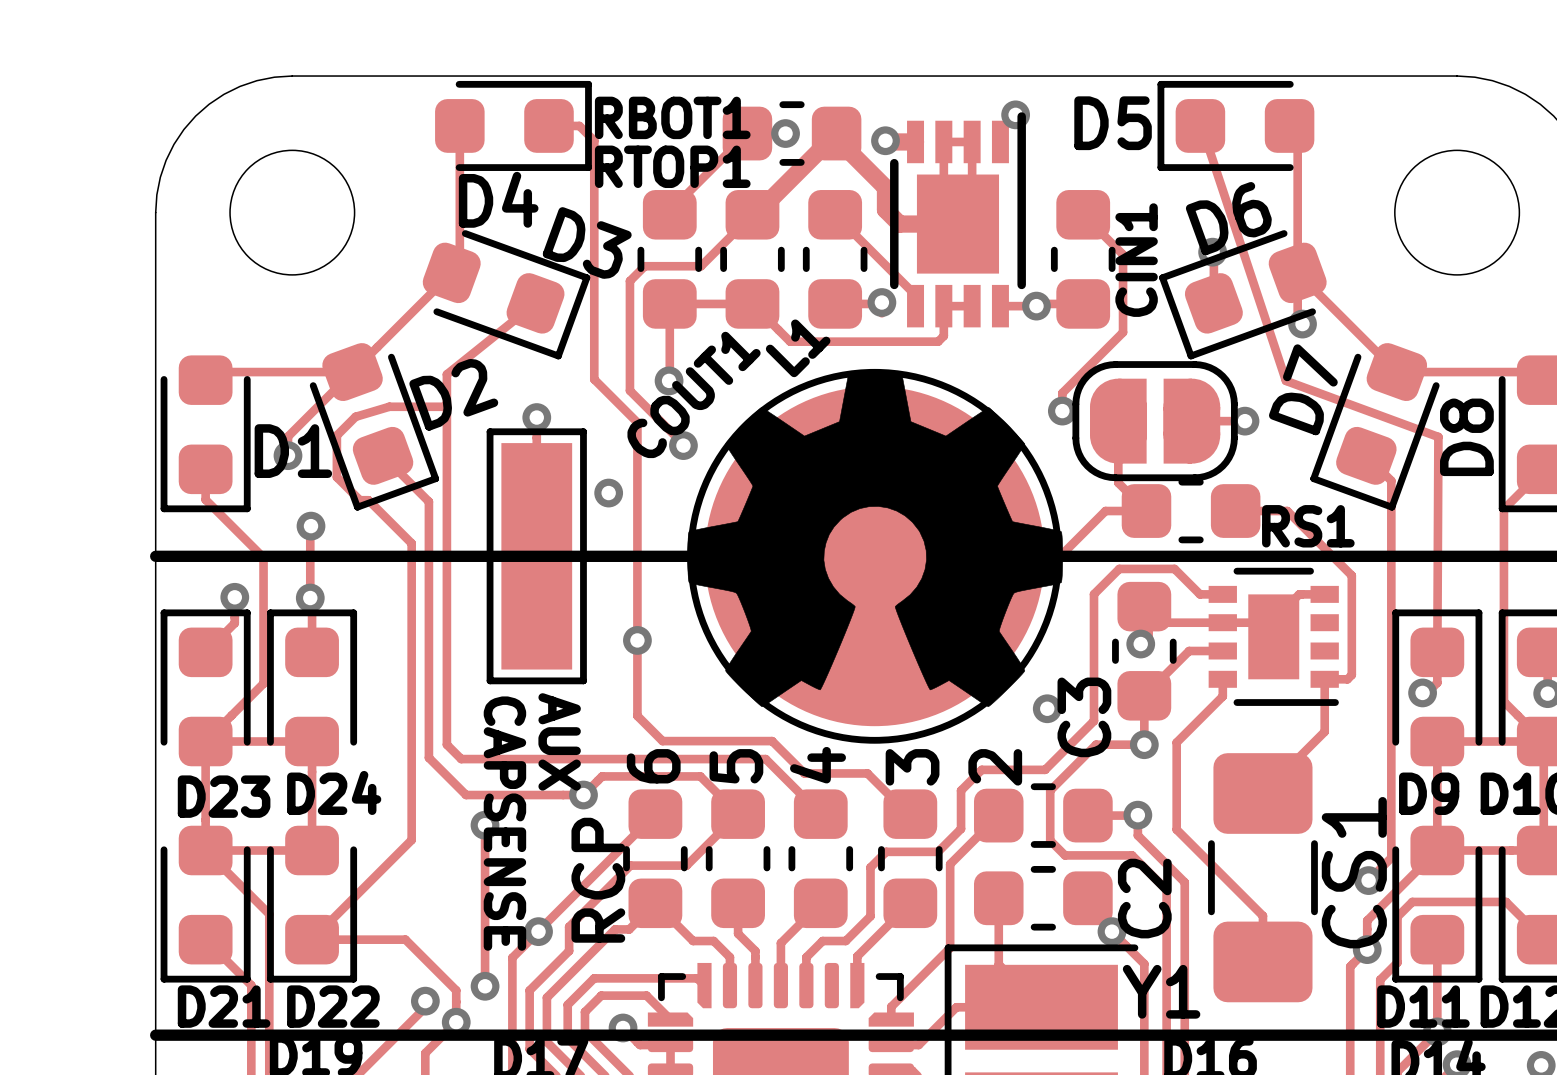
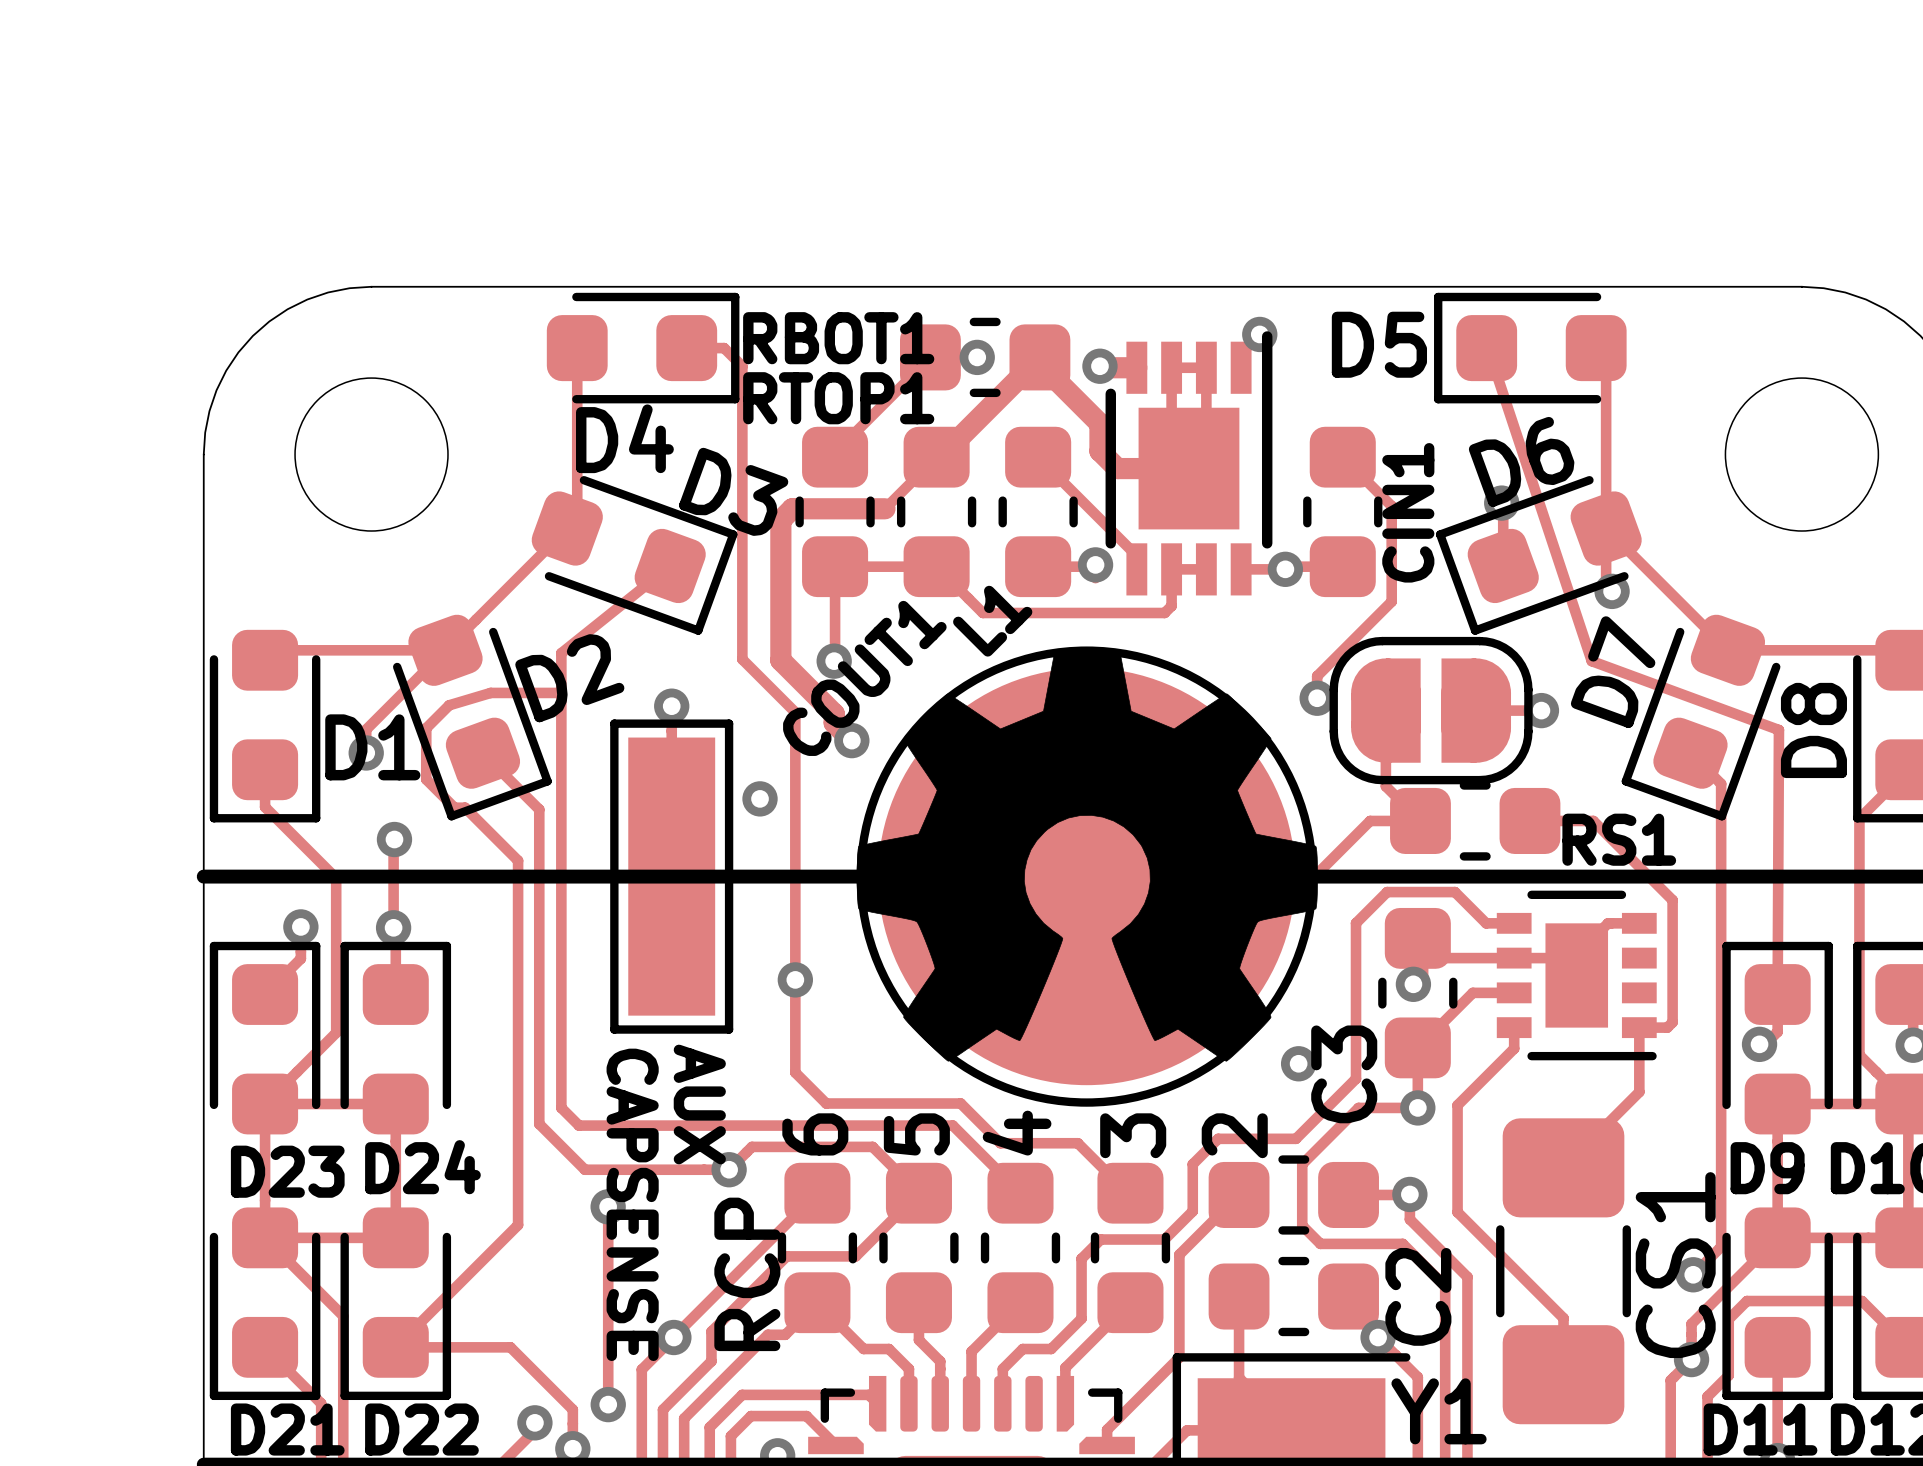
track: (710, 256) (701, 266) (644, 266) (629, 281) (629, 390) (683, 444) -> (885, 508) (792, 508) (780, 520) (780, 660) (834, 713) (834, 722) (851, 740)

